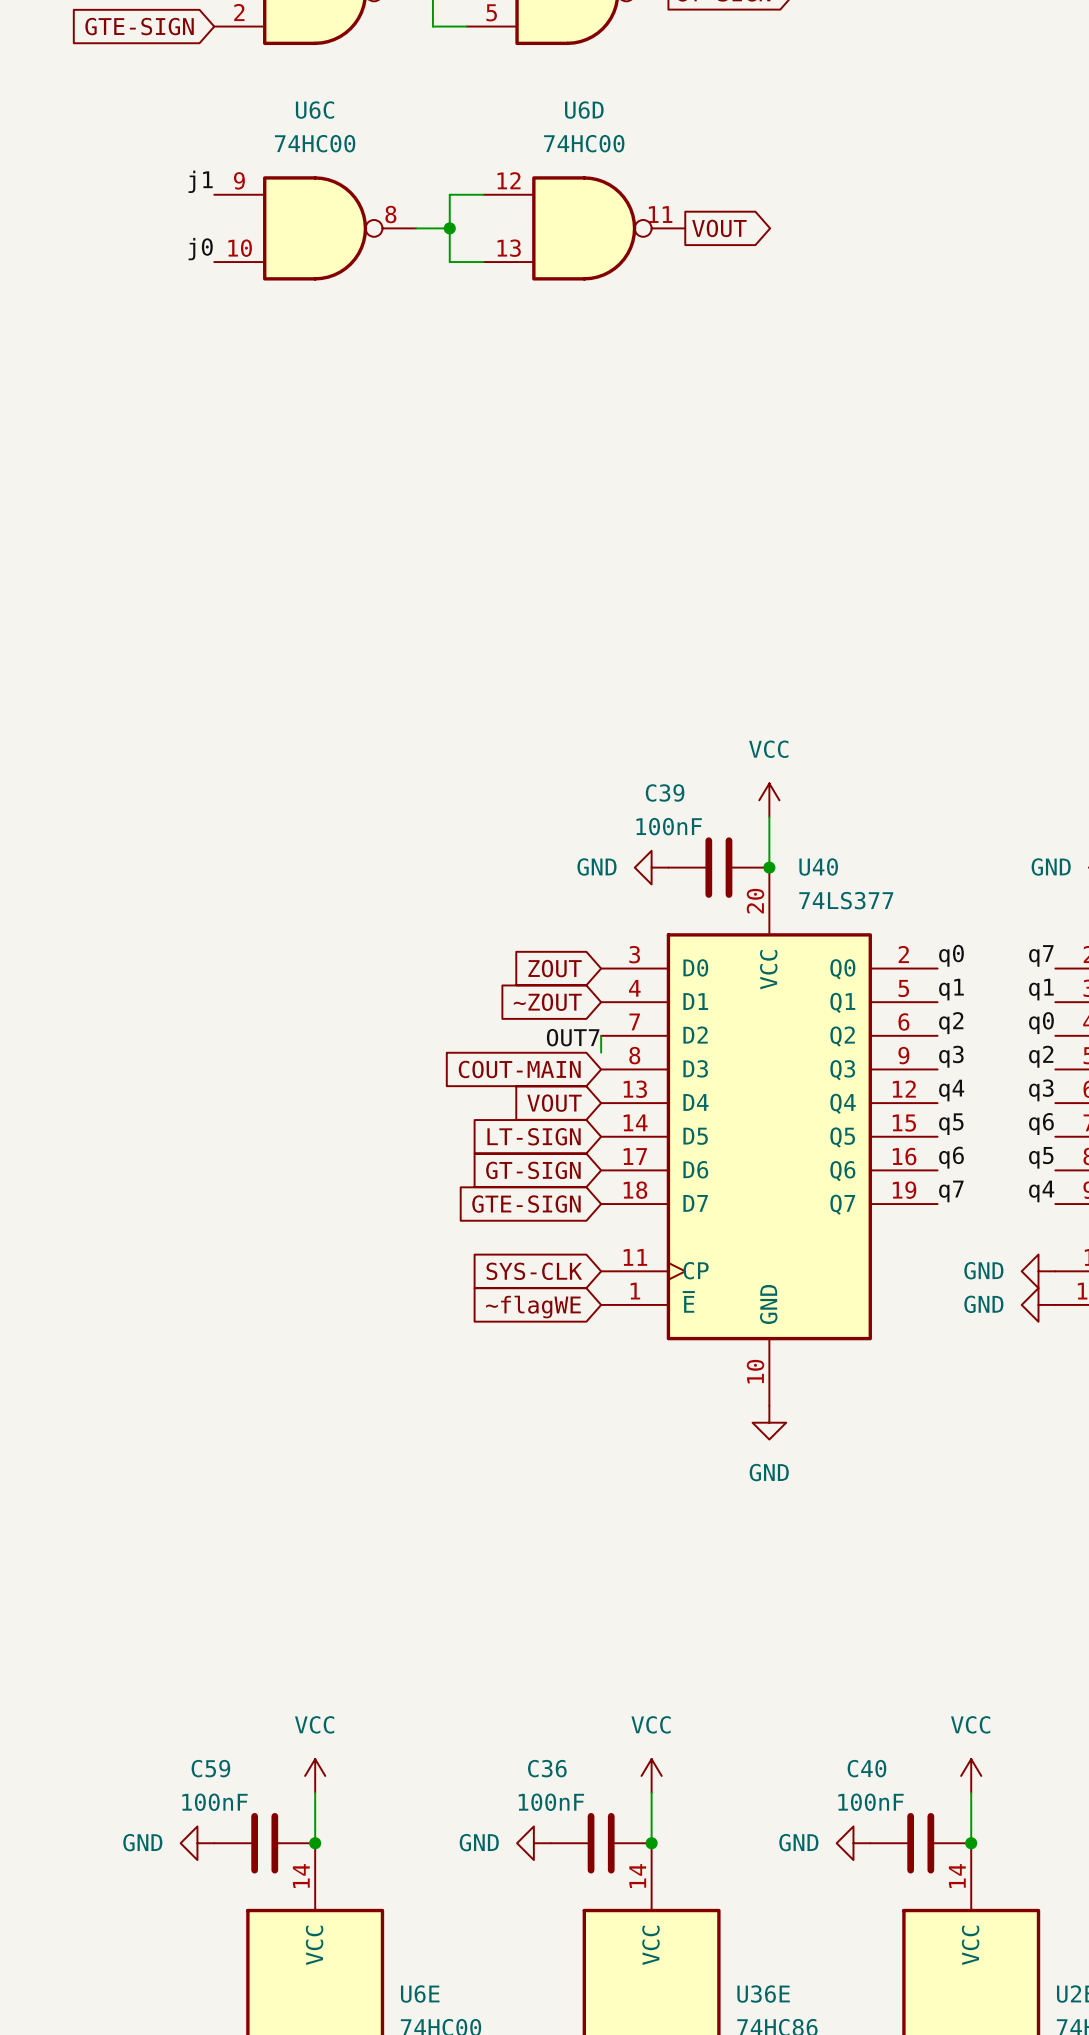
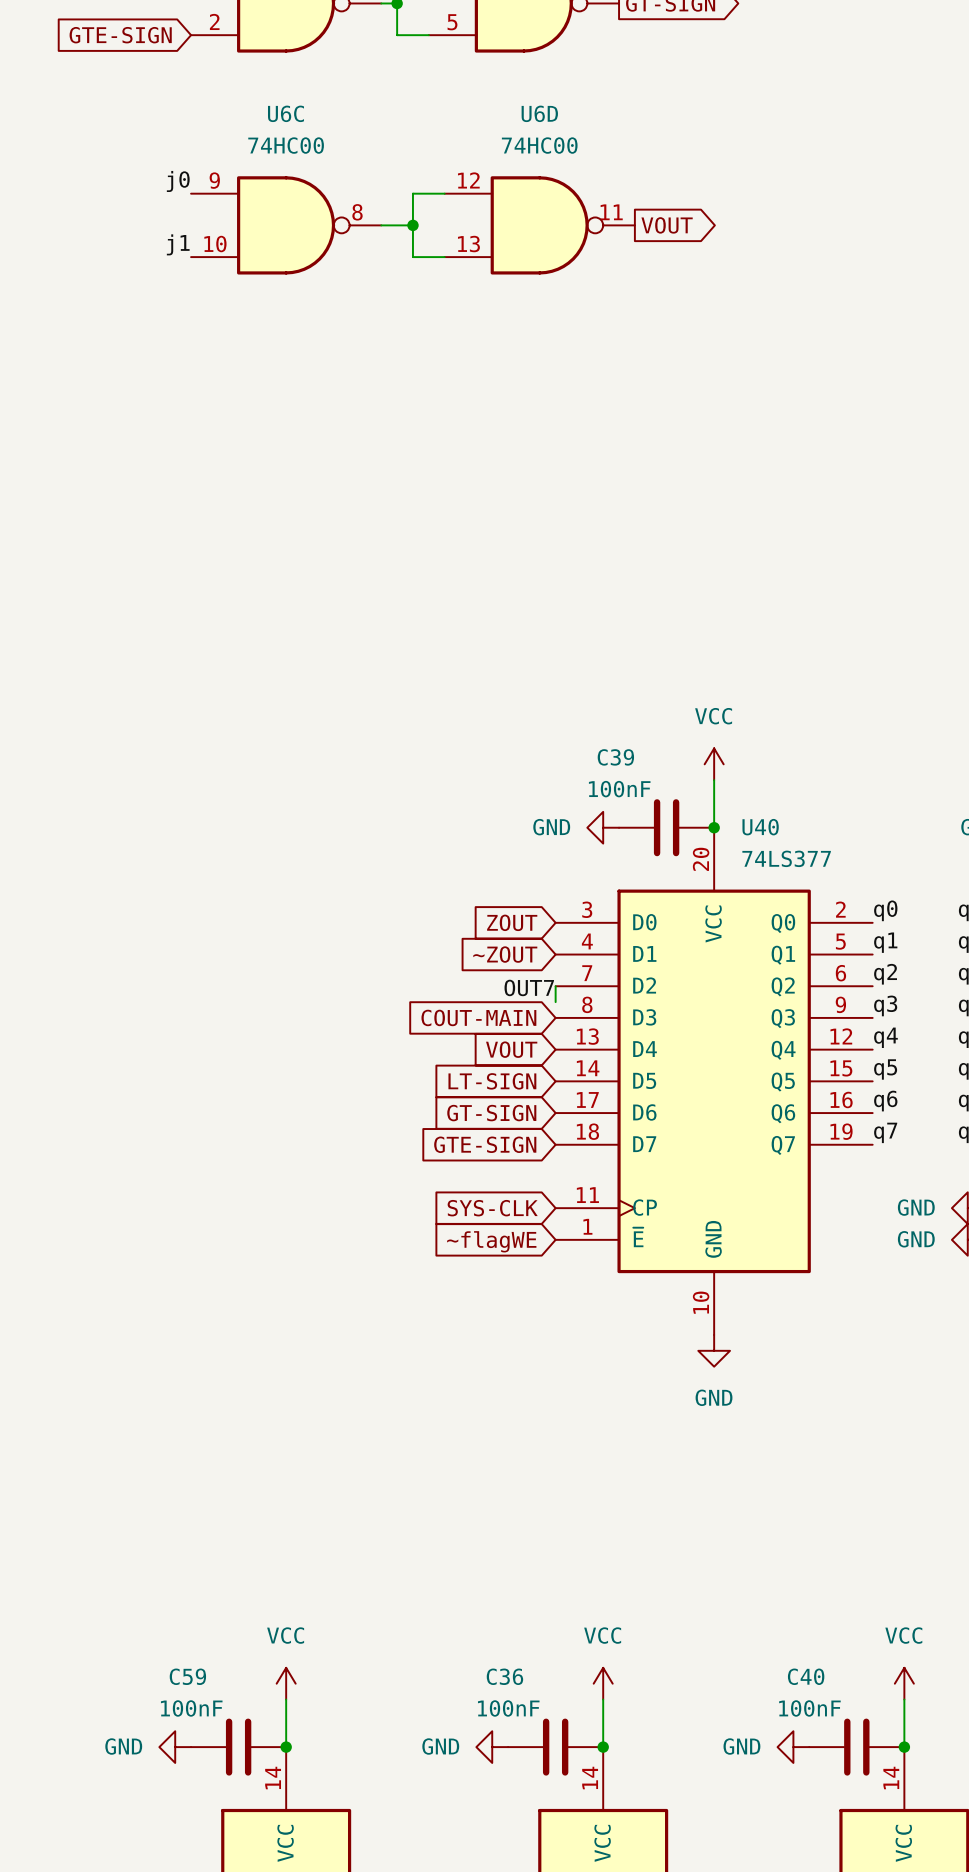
label: j1 (200, 181) -> j0 (178, 181)
label: j0 (200, 249) -> j1 (178, 244)

